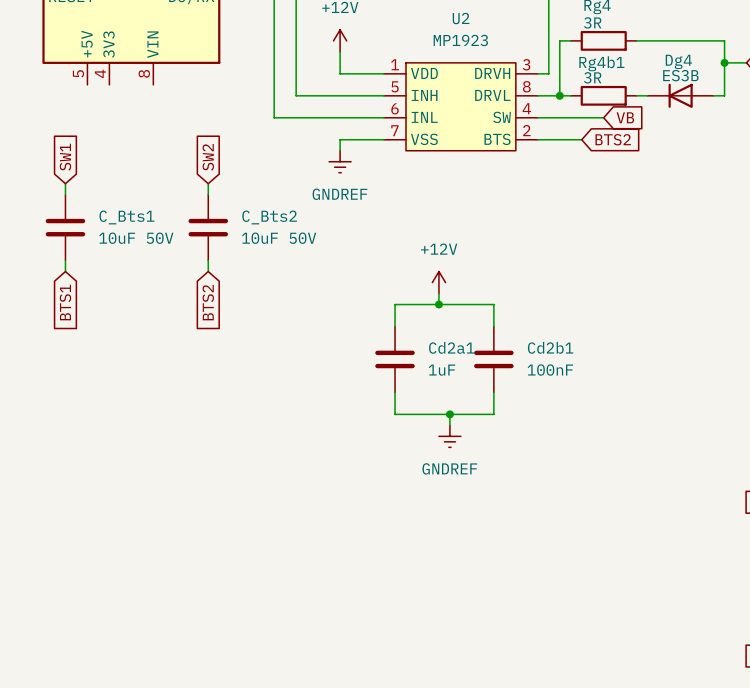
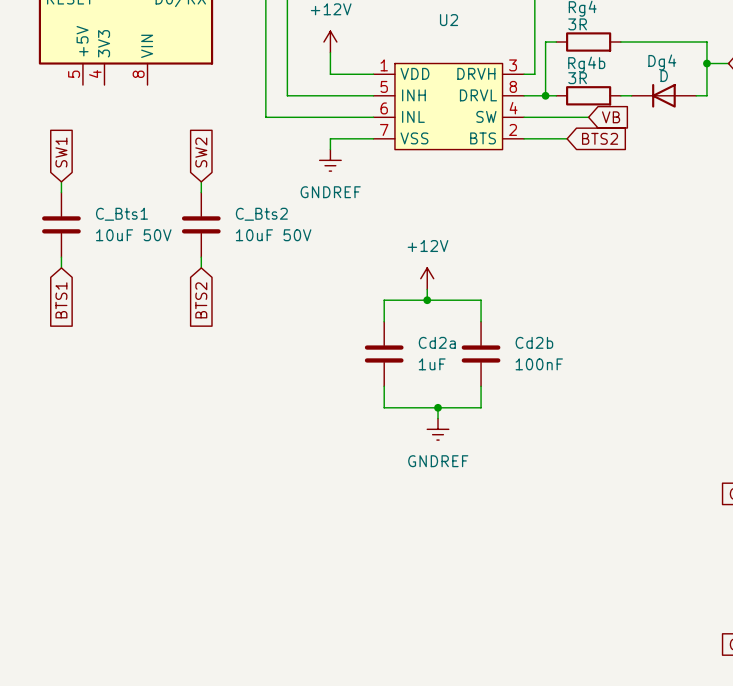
U2 value: MP1923 (460, 40) -> none
Rg4b1 name: Rg4b1 (601, 63) -> Rg4b (586, 64)
Dg4 value: ES3B (680, 75) -> D (664, 76)
Cd2a1 name: Cd2a1 (451, 347) -> Cd2a (437, 342)
Cd2b1 name: Cd2b1 (550, 347) -> Cd2b (534, 342)

